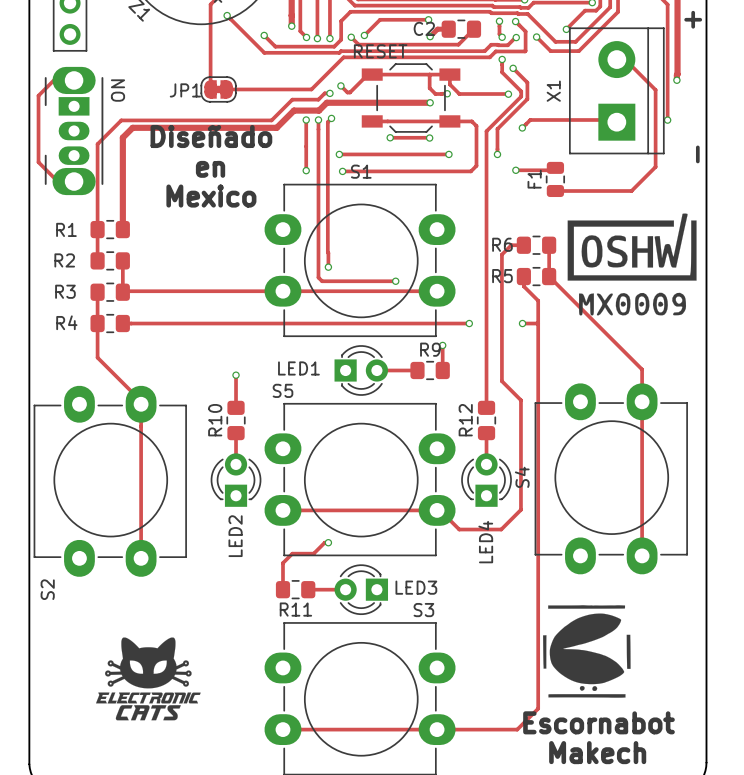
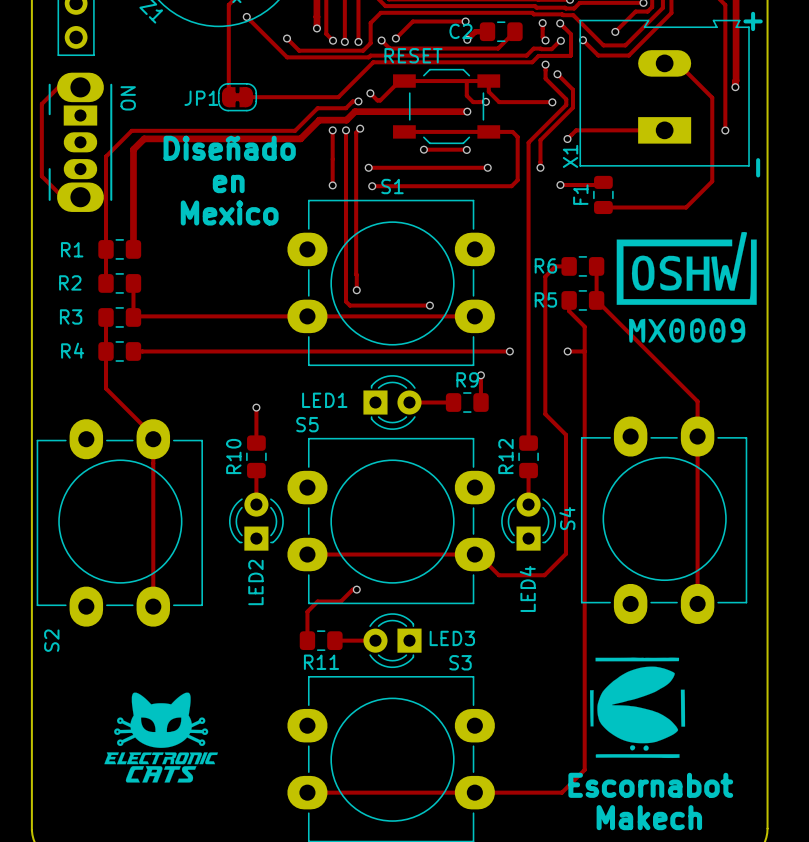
X1 footprint: [569, 27, 665, 155] -> [579, 19, 750, 167]
X1 name position: X1 (553, 91) -> X1 (570, 156)

